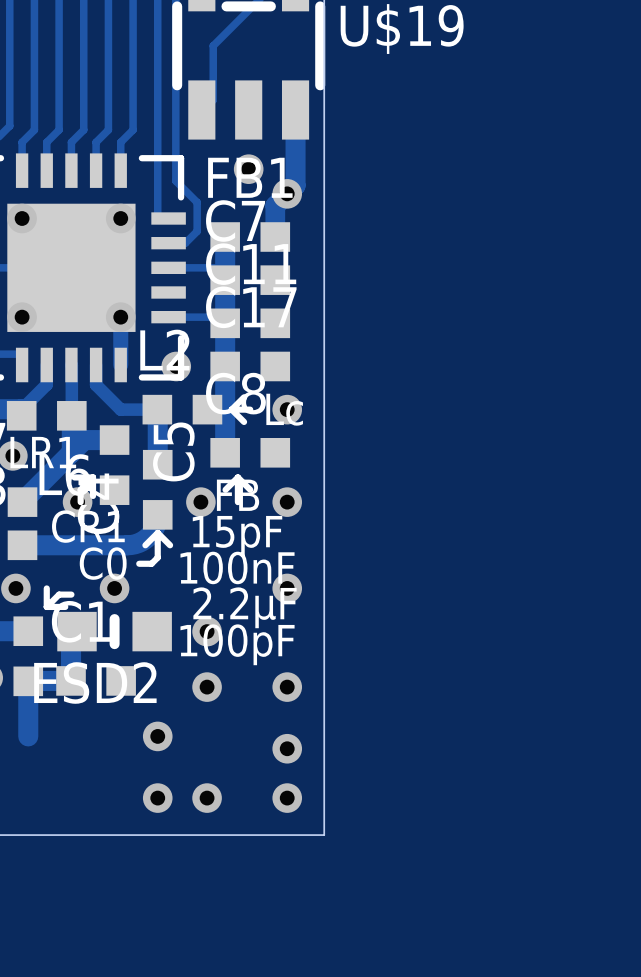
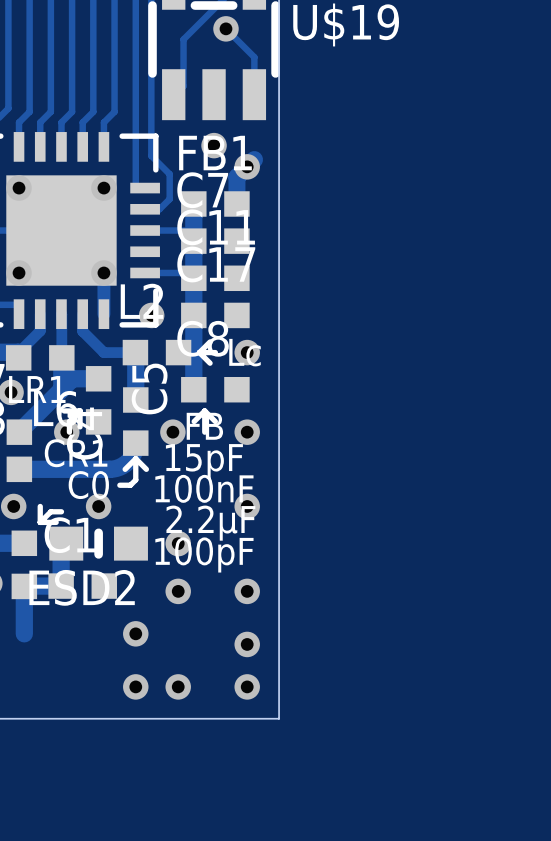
via: none -> (225, 28)
track: (295, 109) (295, 185) -> (254, 94) (254, 57) (225, 28)

